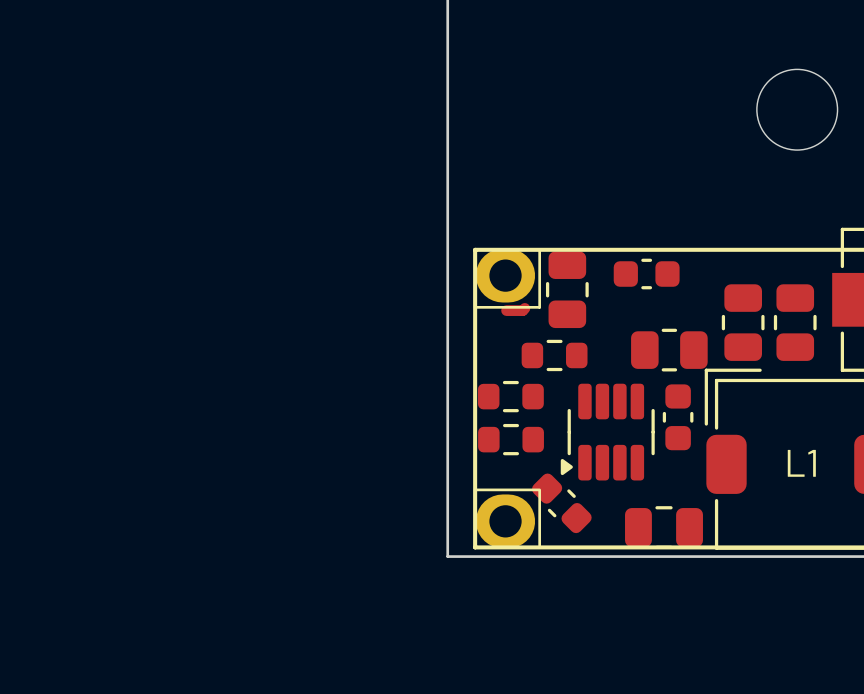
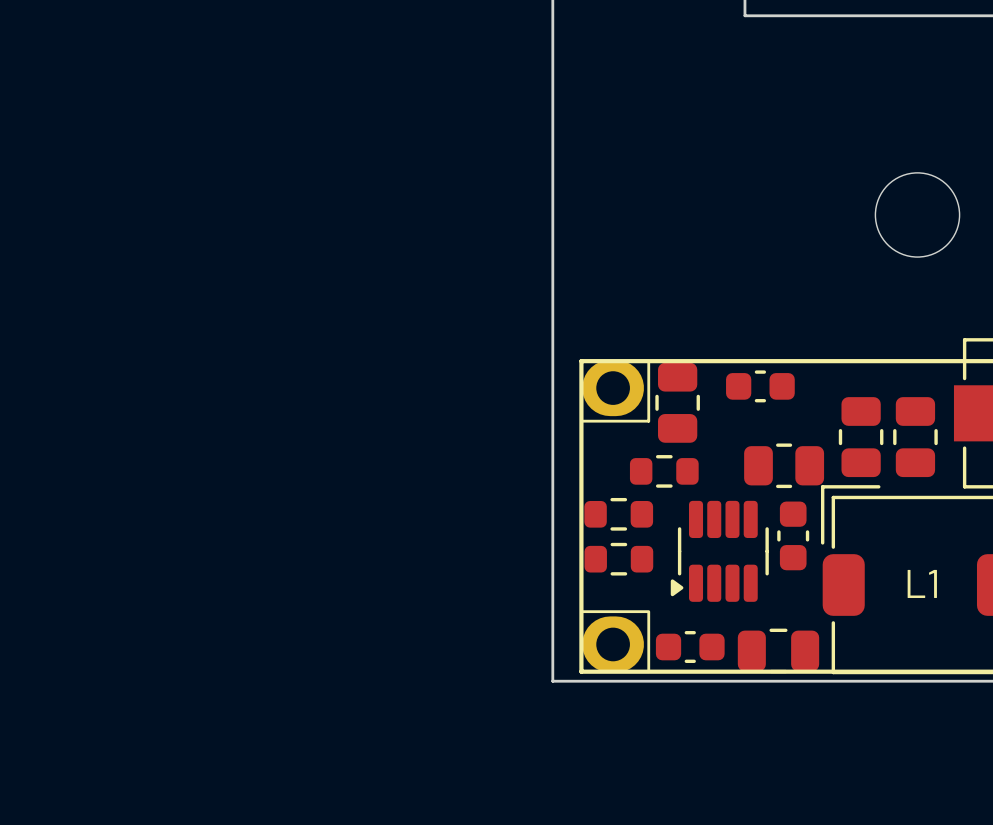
top track: (524, 308) (522, 310) (506, 310) -> none
part: (561, 503) -> none
part: none -> (690, 647)

